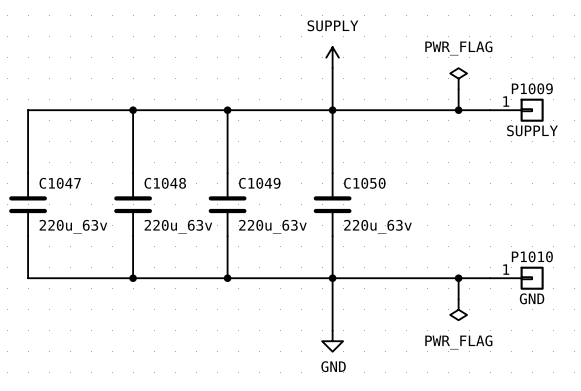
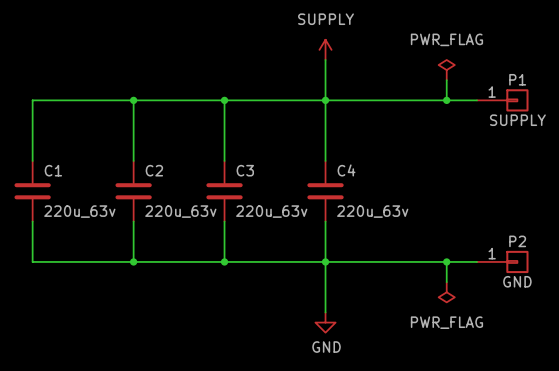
P1009 name: P1009 (532, 88) -> P1 (517, 79)
C1047 name: C1047 (60, 183) -> C1 (53, 170)
C1048 name: C1048 (165, 183) -> C2 (154, 170)
C1049 name: C1049 (259, 183) -> C3 (245, 170)
C1050 name: C1050 (364, 183) -> C4 (346, 170)
P1010 name: P1010 (532, 256) -> P2 (517, 241)

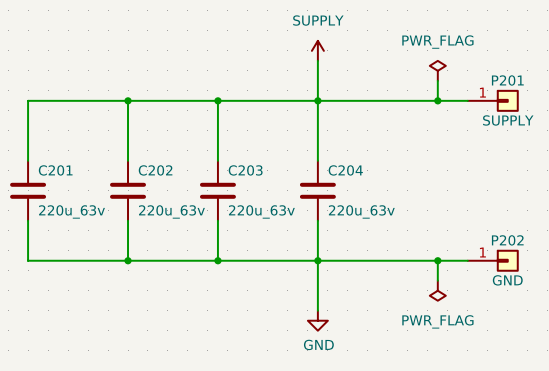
P1 name: P1 (517, 79) -> P201 (507, 80)
C1 name: C1 (53, 170) -> C201 (55, 170)
C2 name: C2 (154, 170) -> C202 (155, 170)
C3 name: C3 (245, 170) -> C203 (245, 170)
C4 name: C4 (346, 170) -> C204 (345, 170)
P2 name: P2 (517, 241) -> P202 (507, 240)

